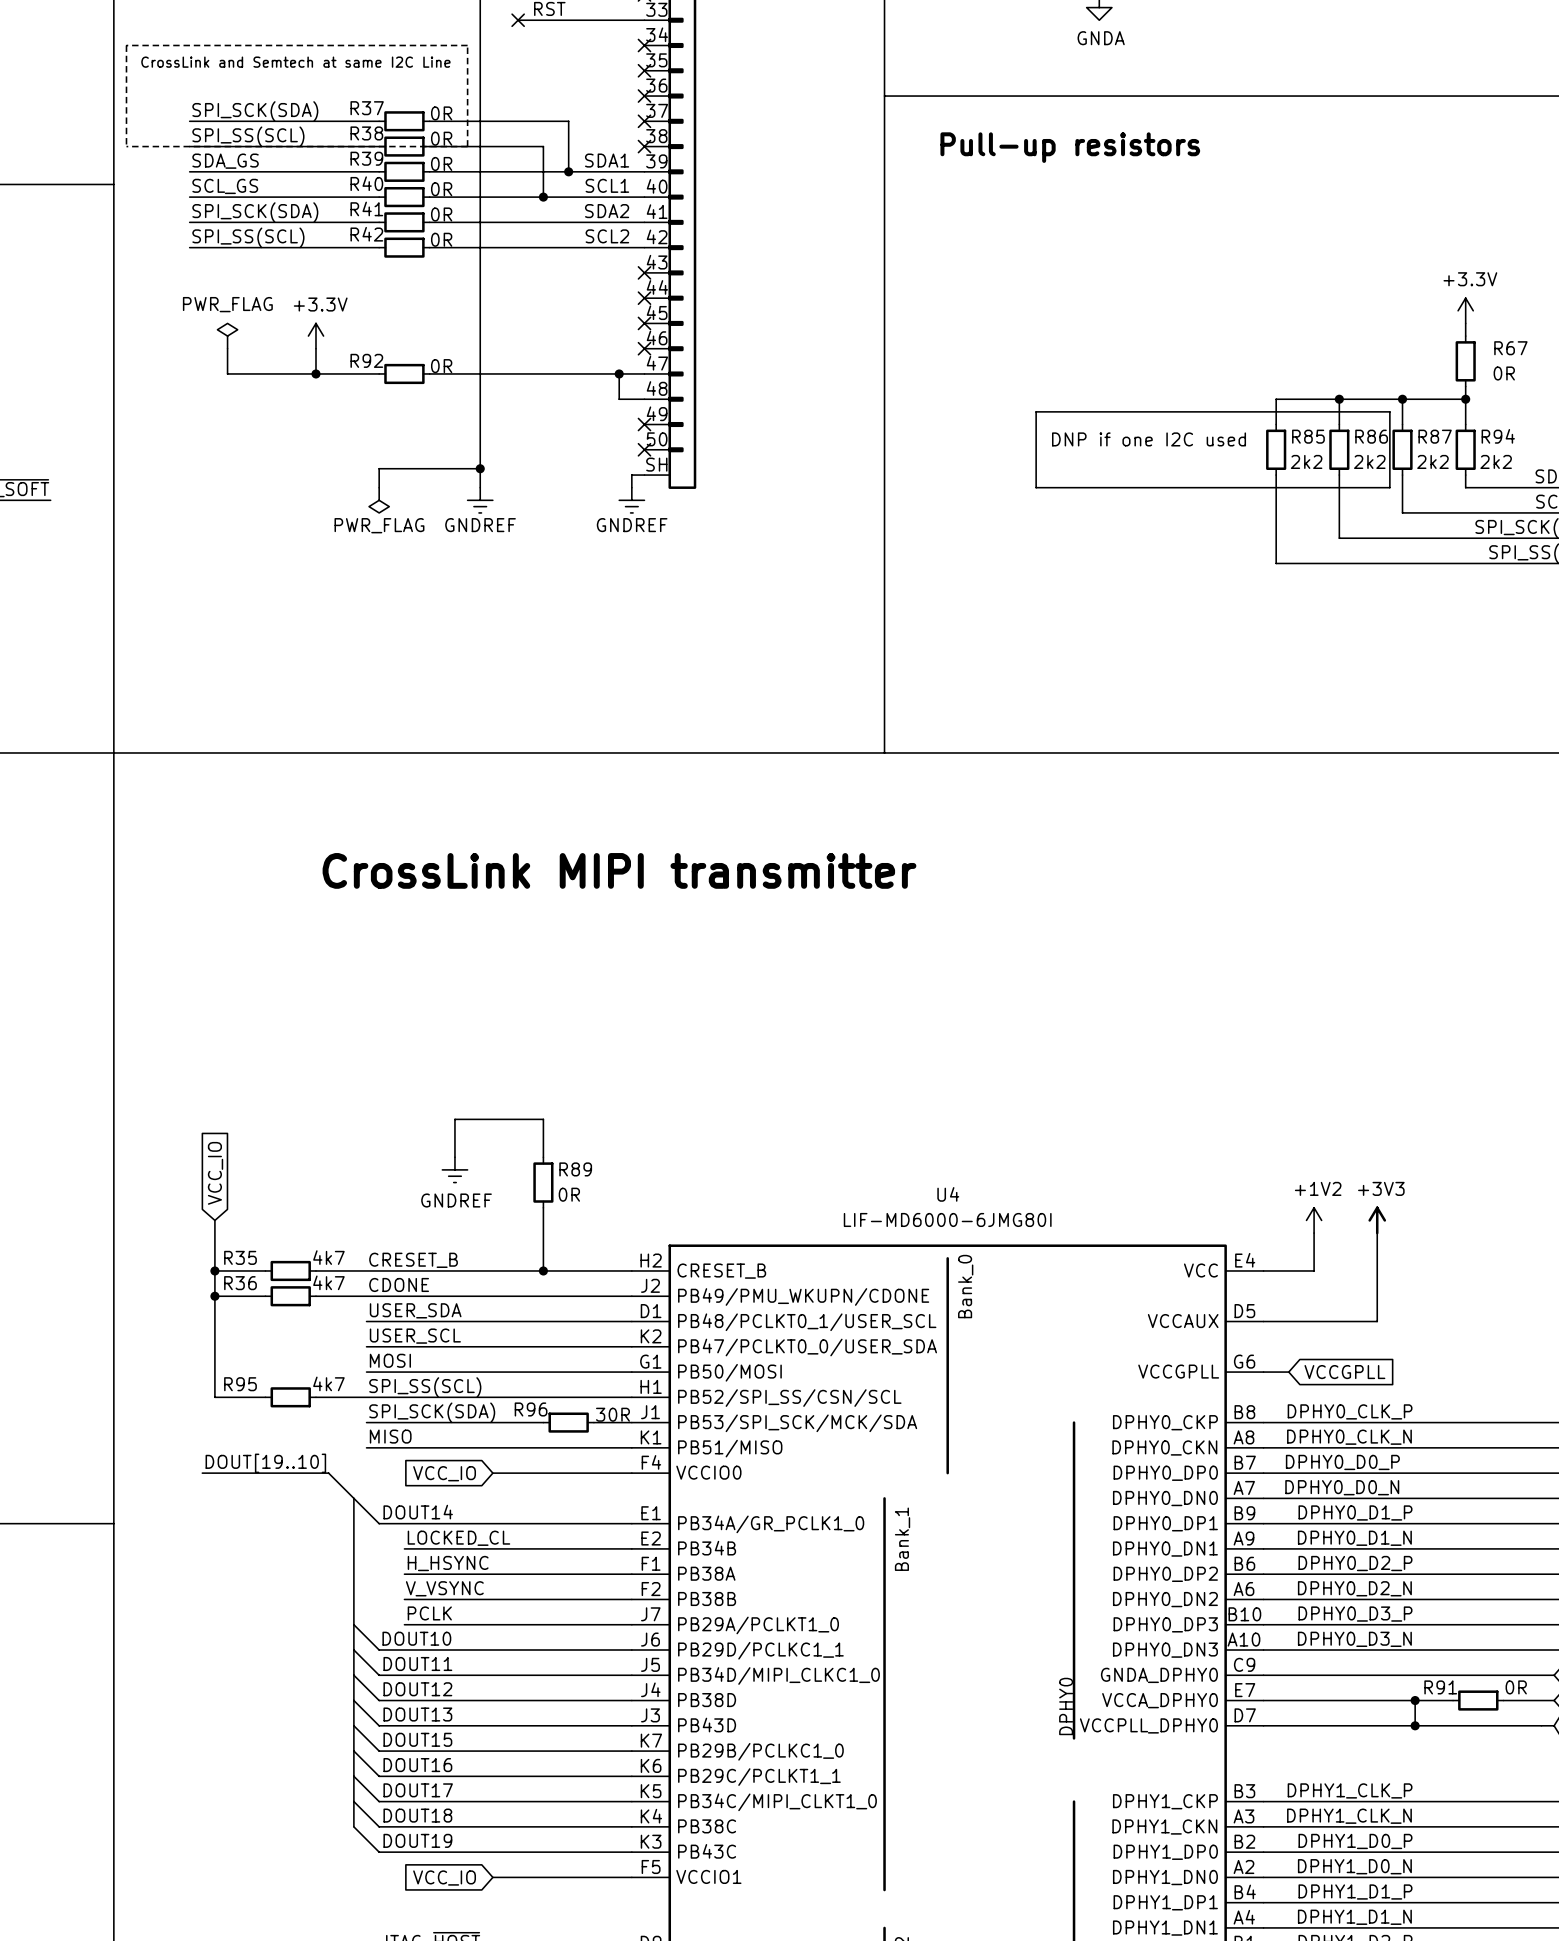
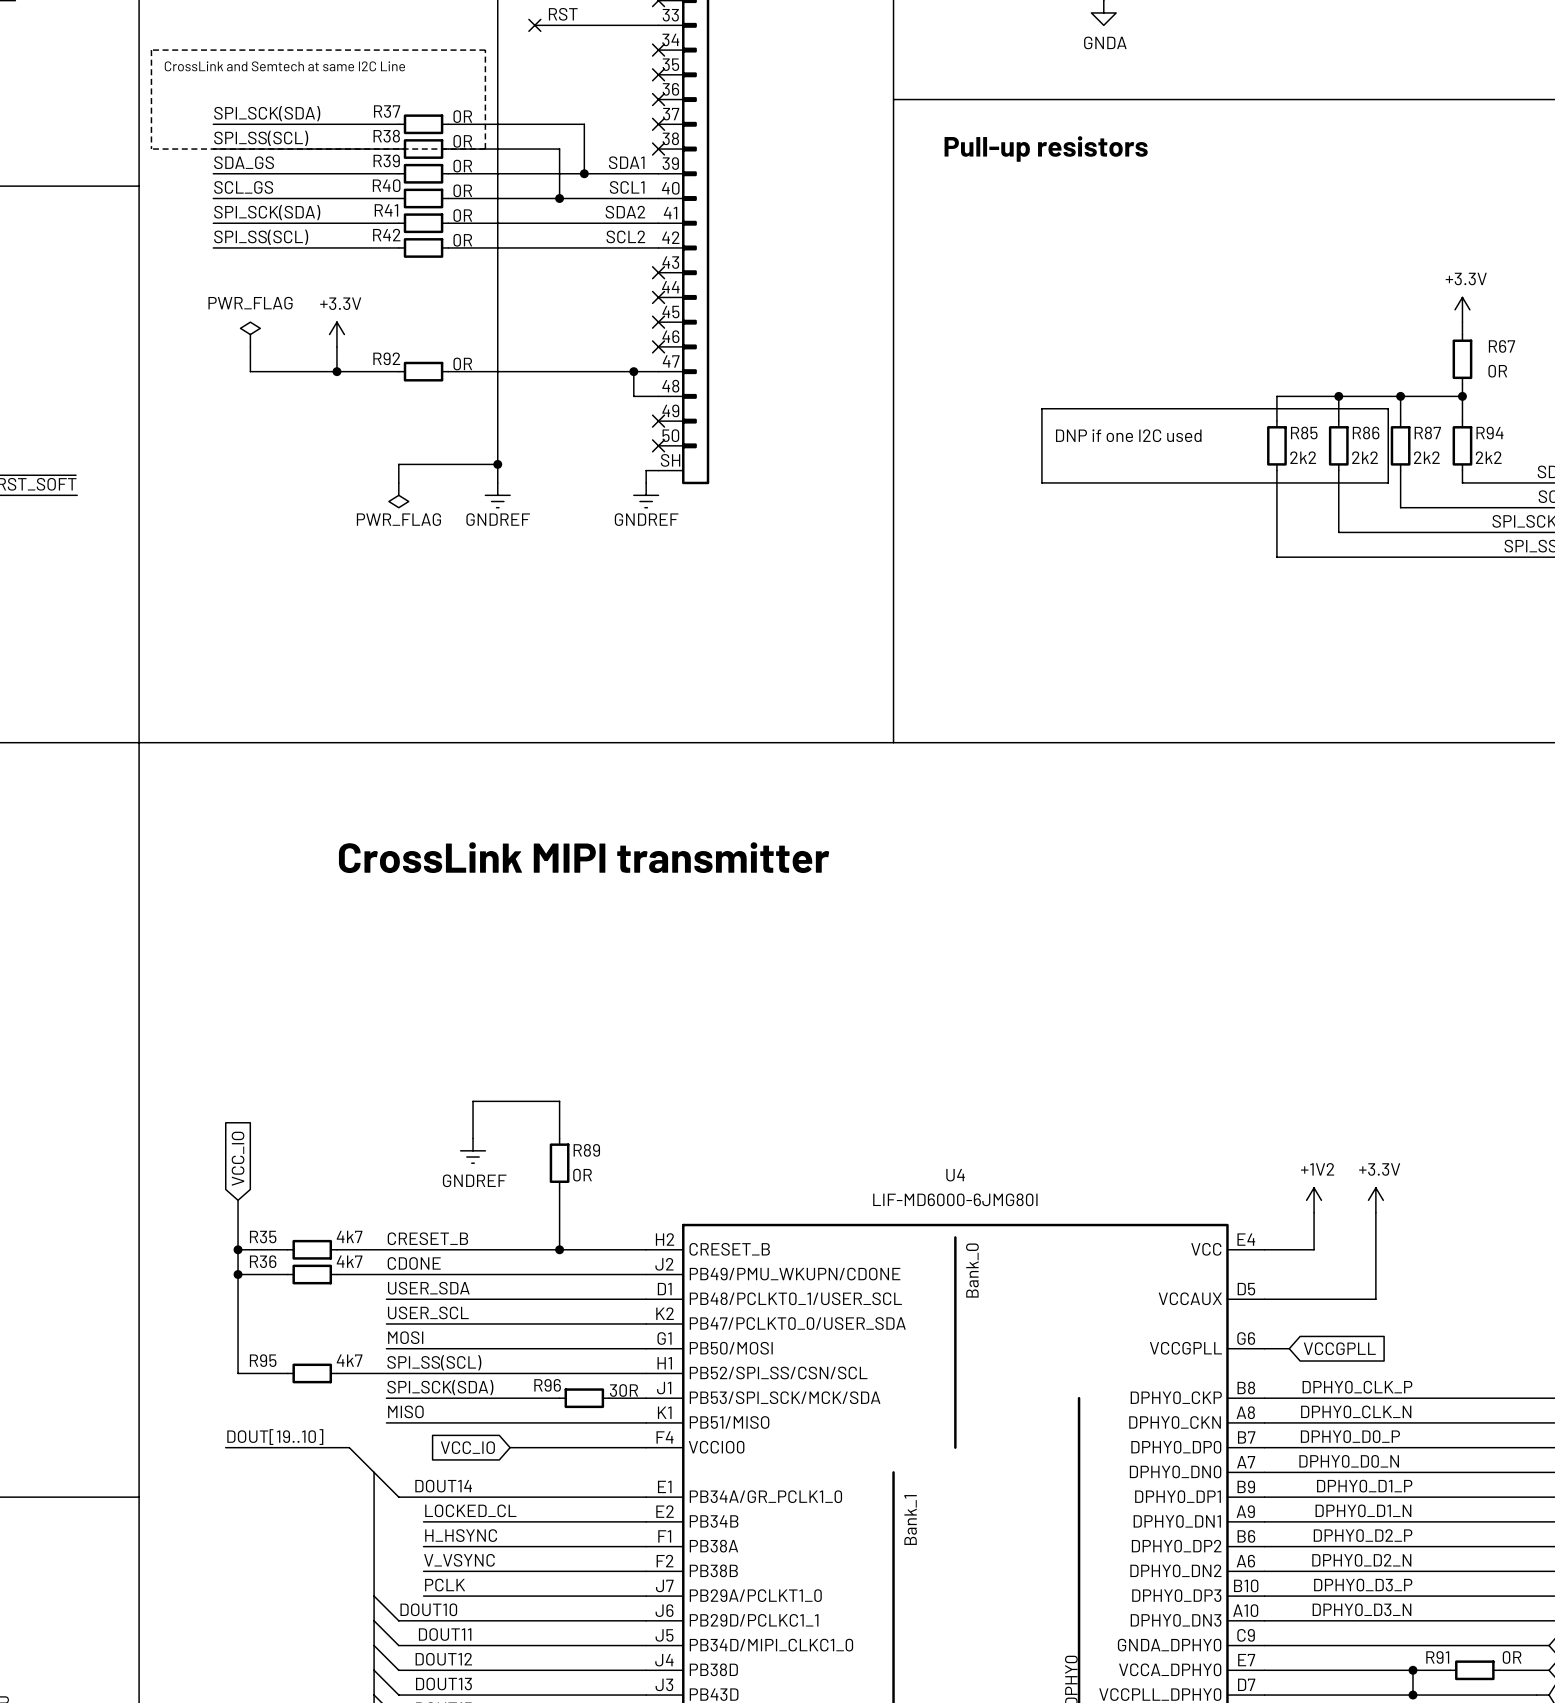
power symbol: +3V3 (1377, 1220) -> +3.3V (1375, 1200)

